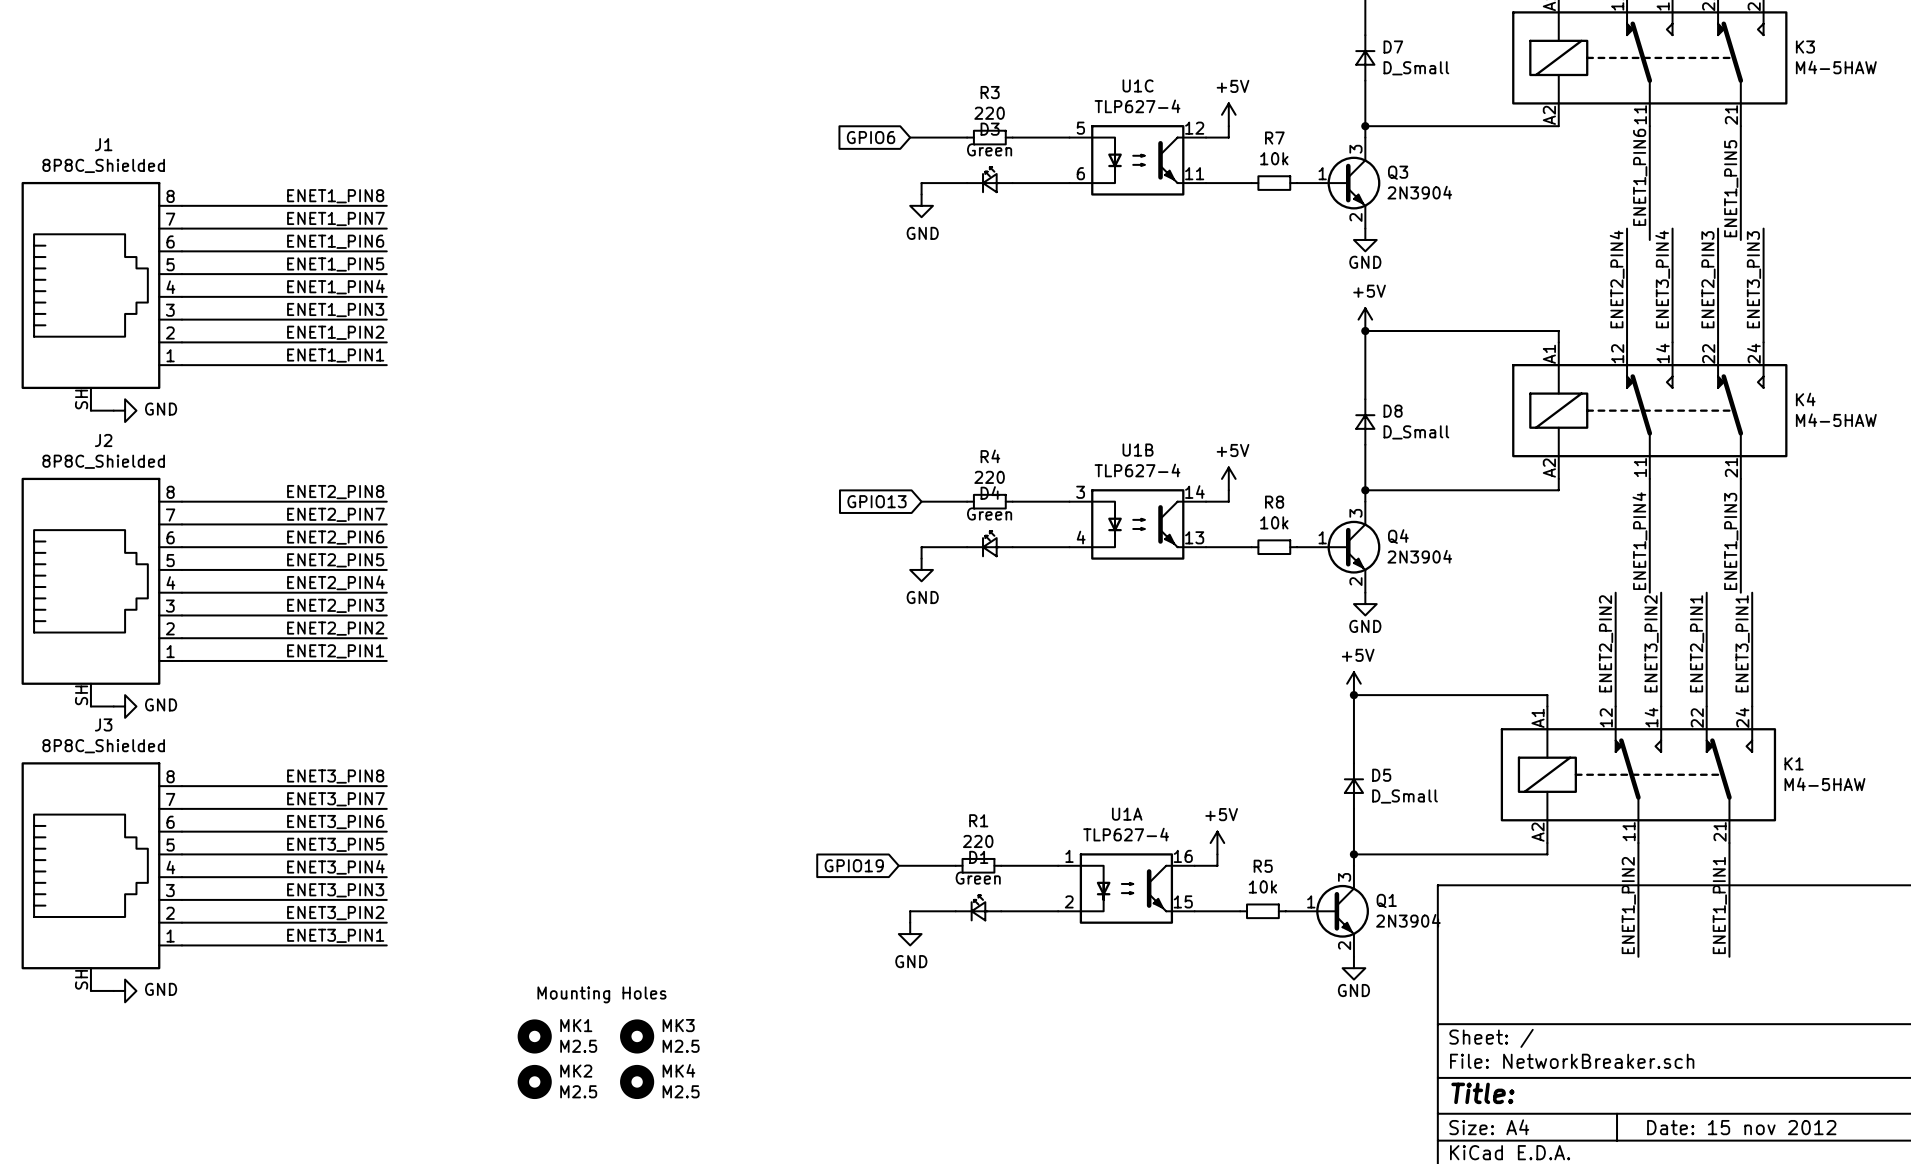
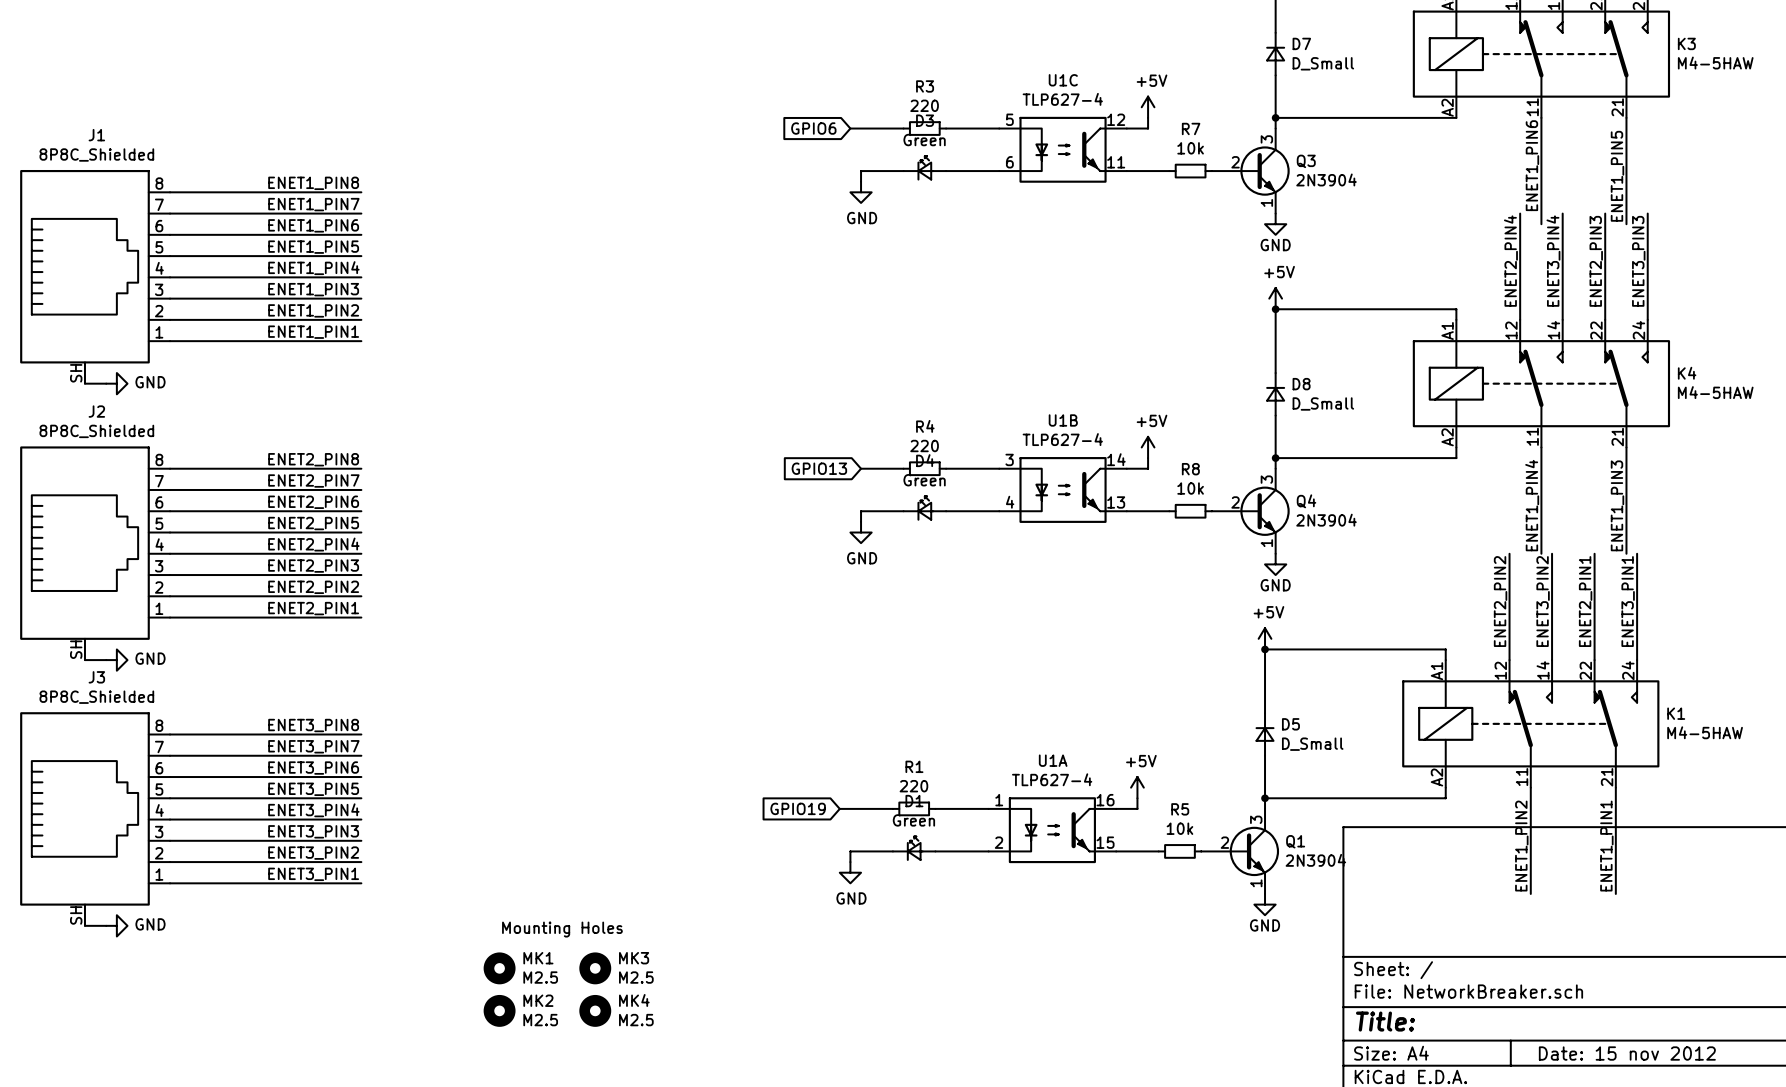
Q3 pin number: 1 (1322, 173) -> 2 (1235, 162)
Q3 pin number: 2 (1355, 217) -> 1 (1266, 202)
Q4 pin number: 1 (1322, 537) -> 2 (1235, 502)
Q4 pin number: 2 (1355, 581) -> 1 (1266, 543)
Q1 pin number: 1 (1311, 901) -> 2 (1224, 842)
Q1 pin number: 2 (1344, 945) -> 1 (1256, 883)

